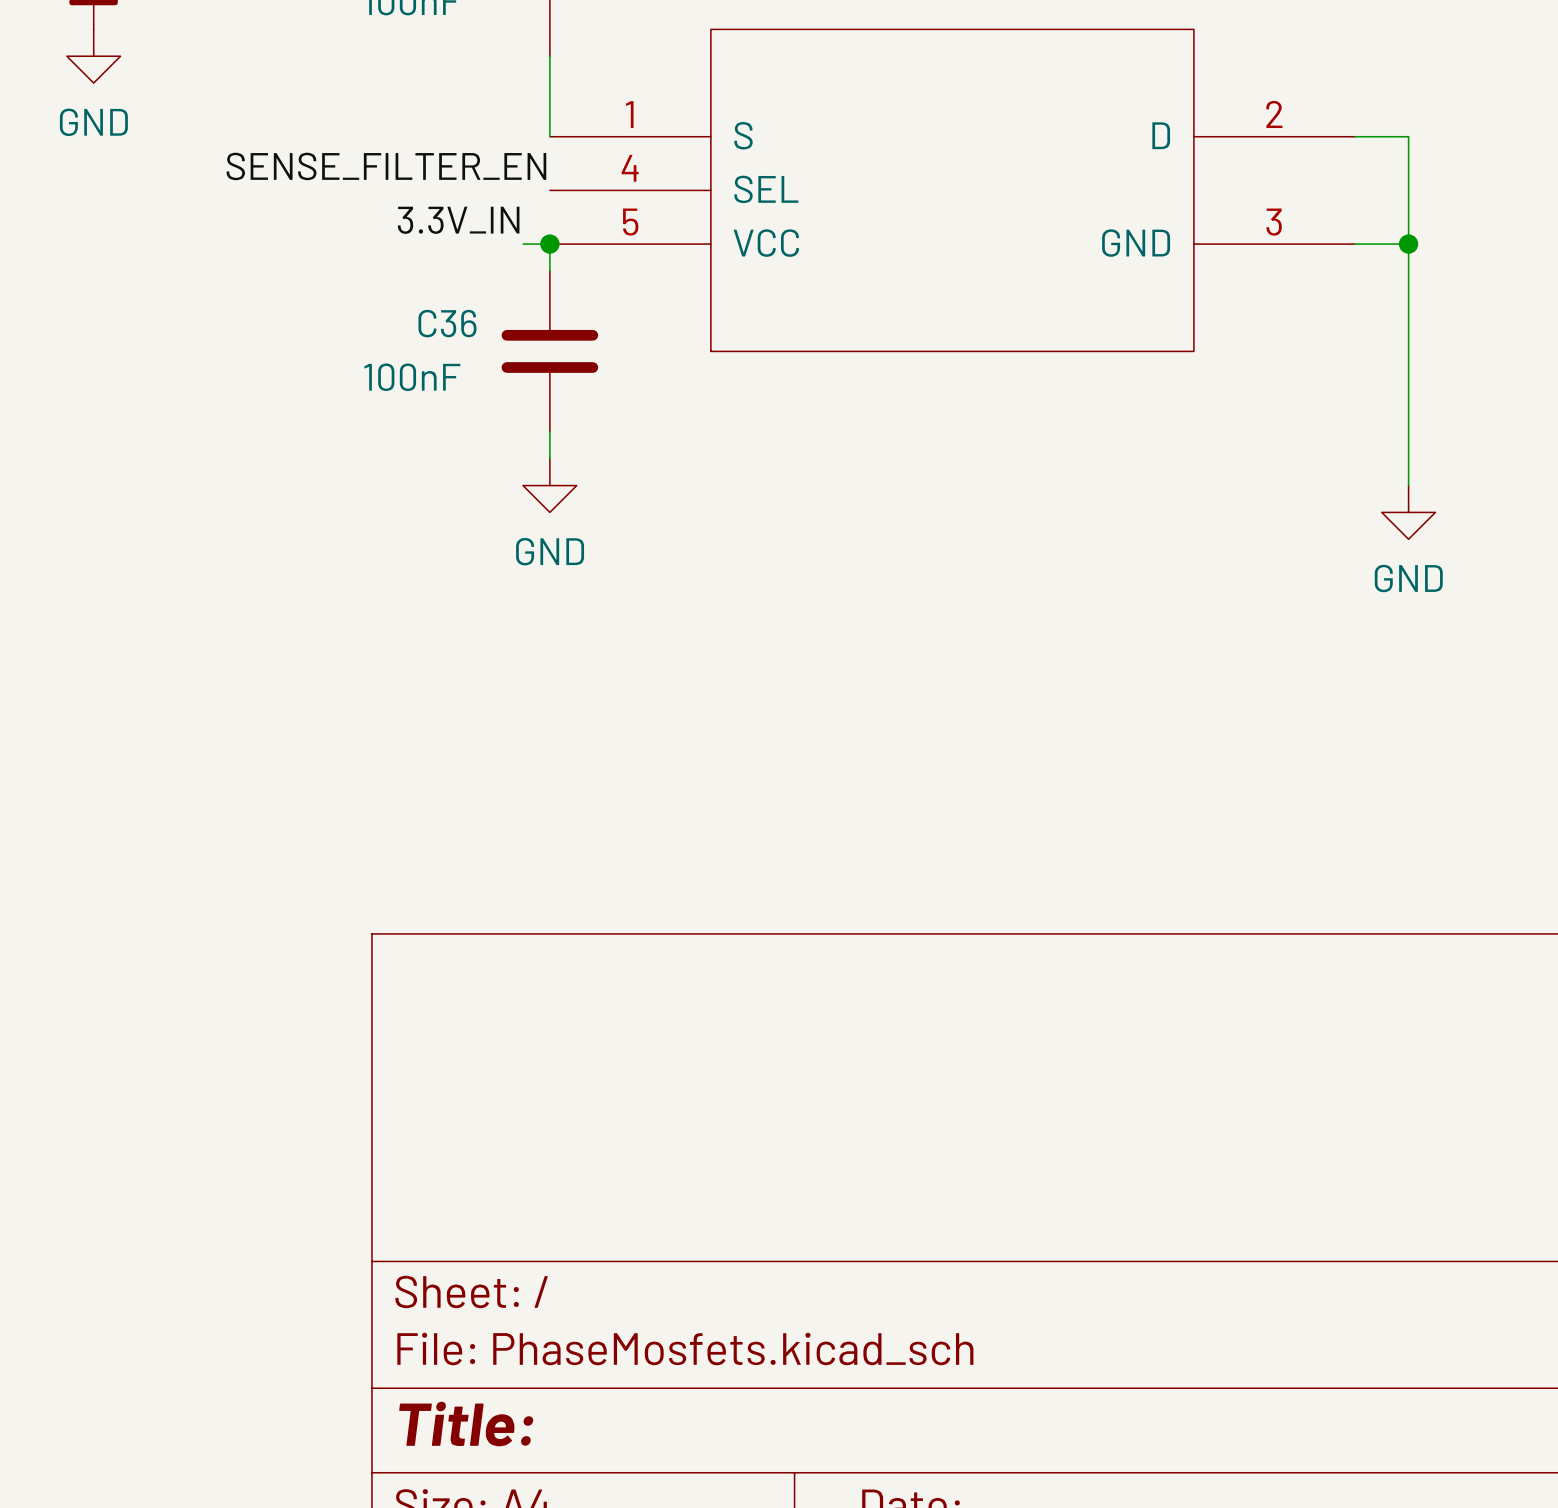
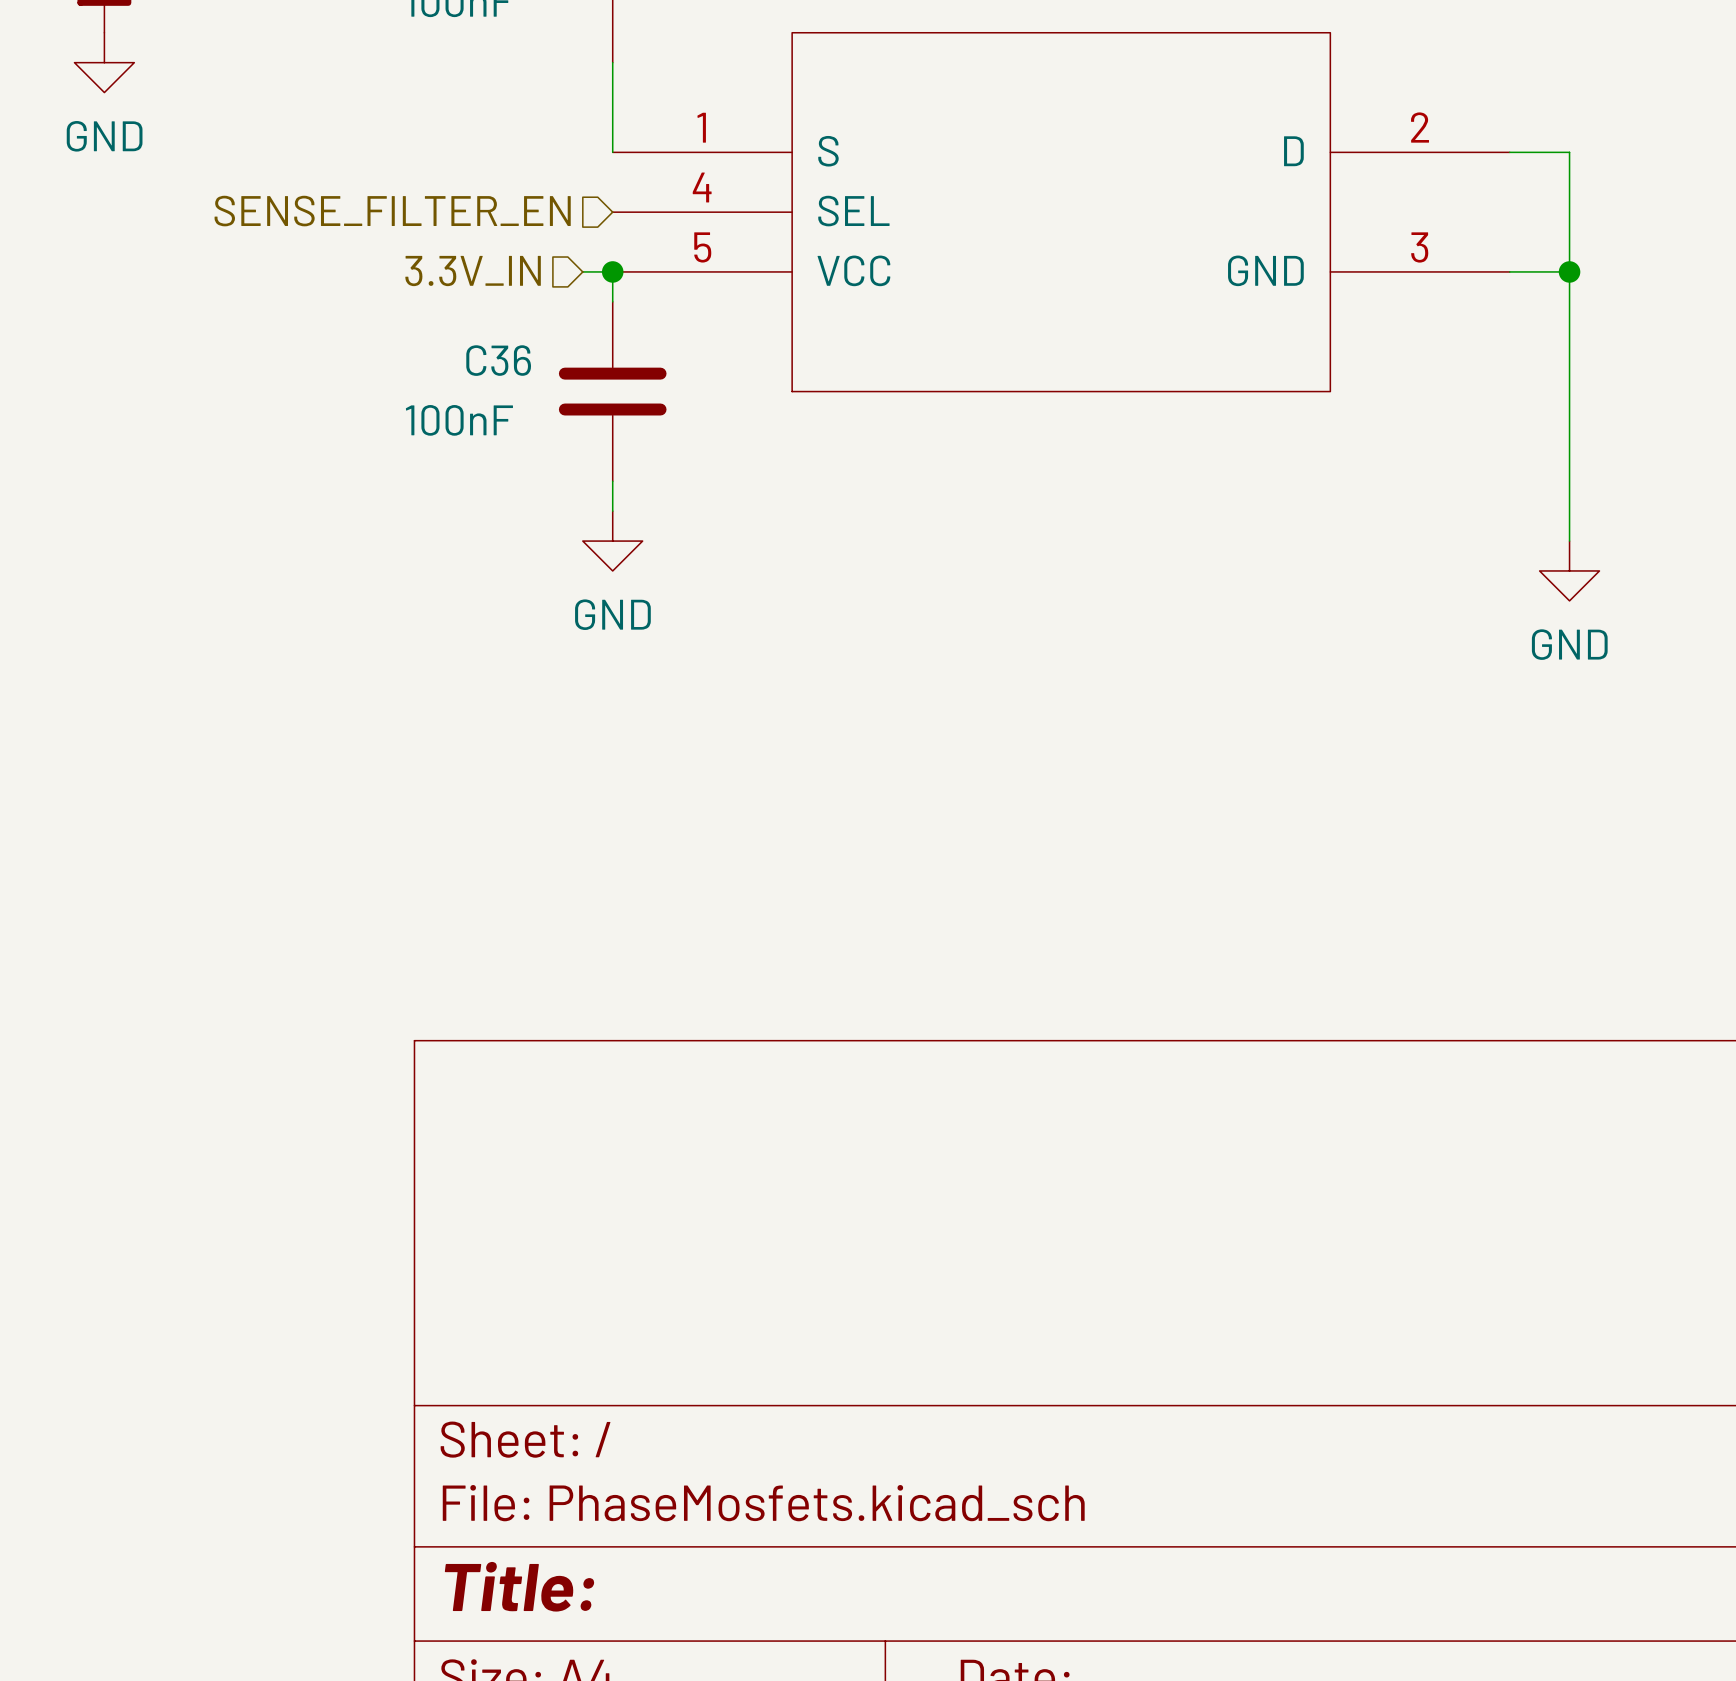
label: SENSE_FILTER_EN (386, 166) -> none
hierarchical label: none -> SENSE_FILTER_EN (392, 211)
label: 3.3V_IN (458, 220) -> none
hierarchical label: none -> 3.3V_IN (473, 271)

